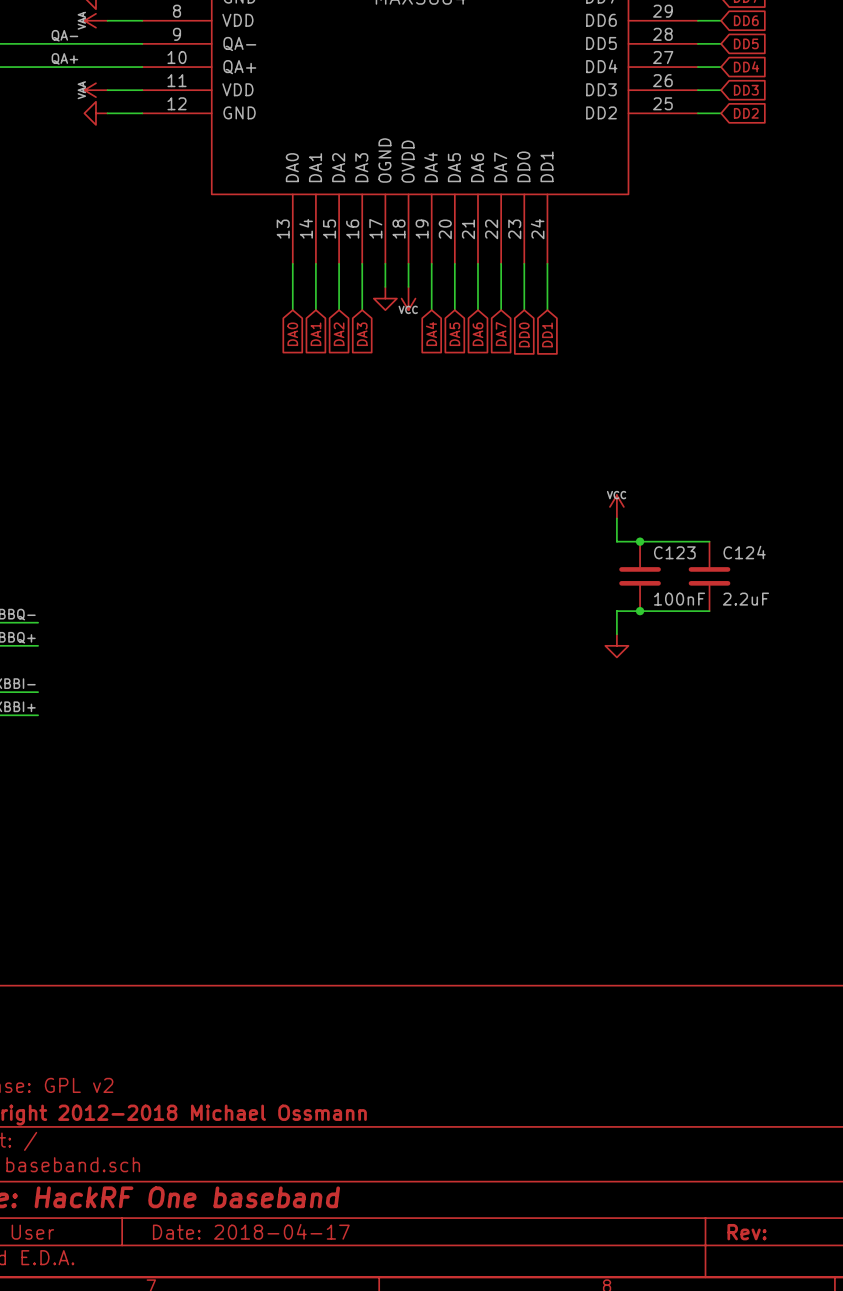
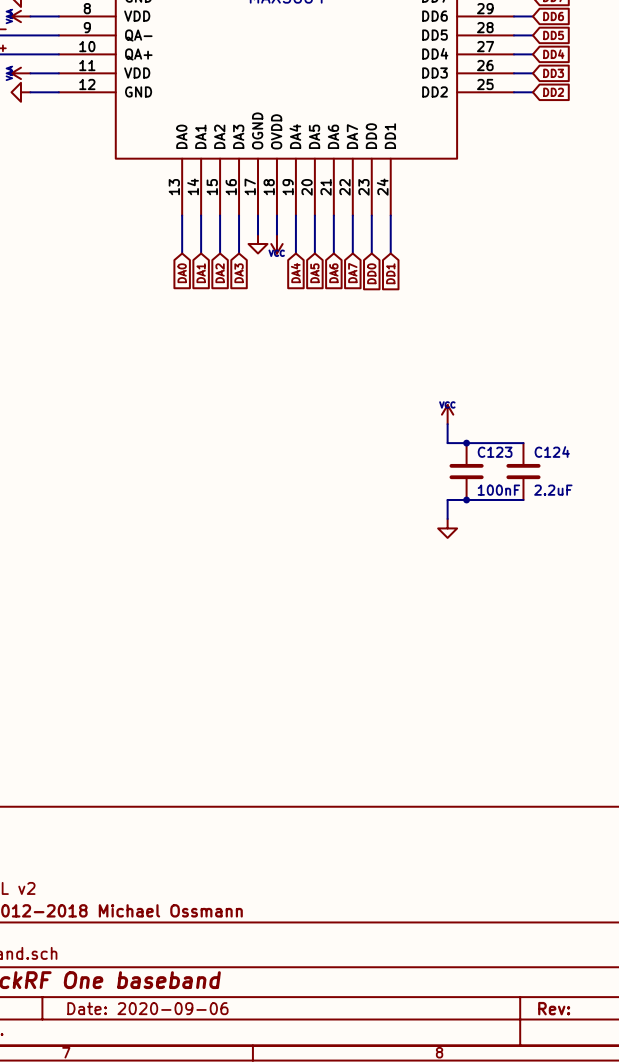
title block: Date: 2018-04-17 (251, 1231) -> Date: 2020-09-06 (147, 1008)

